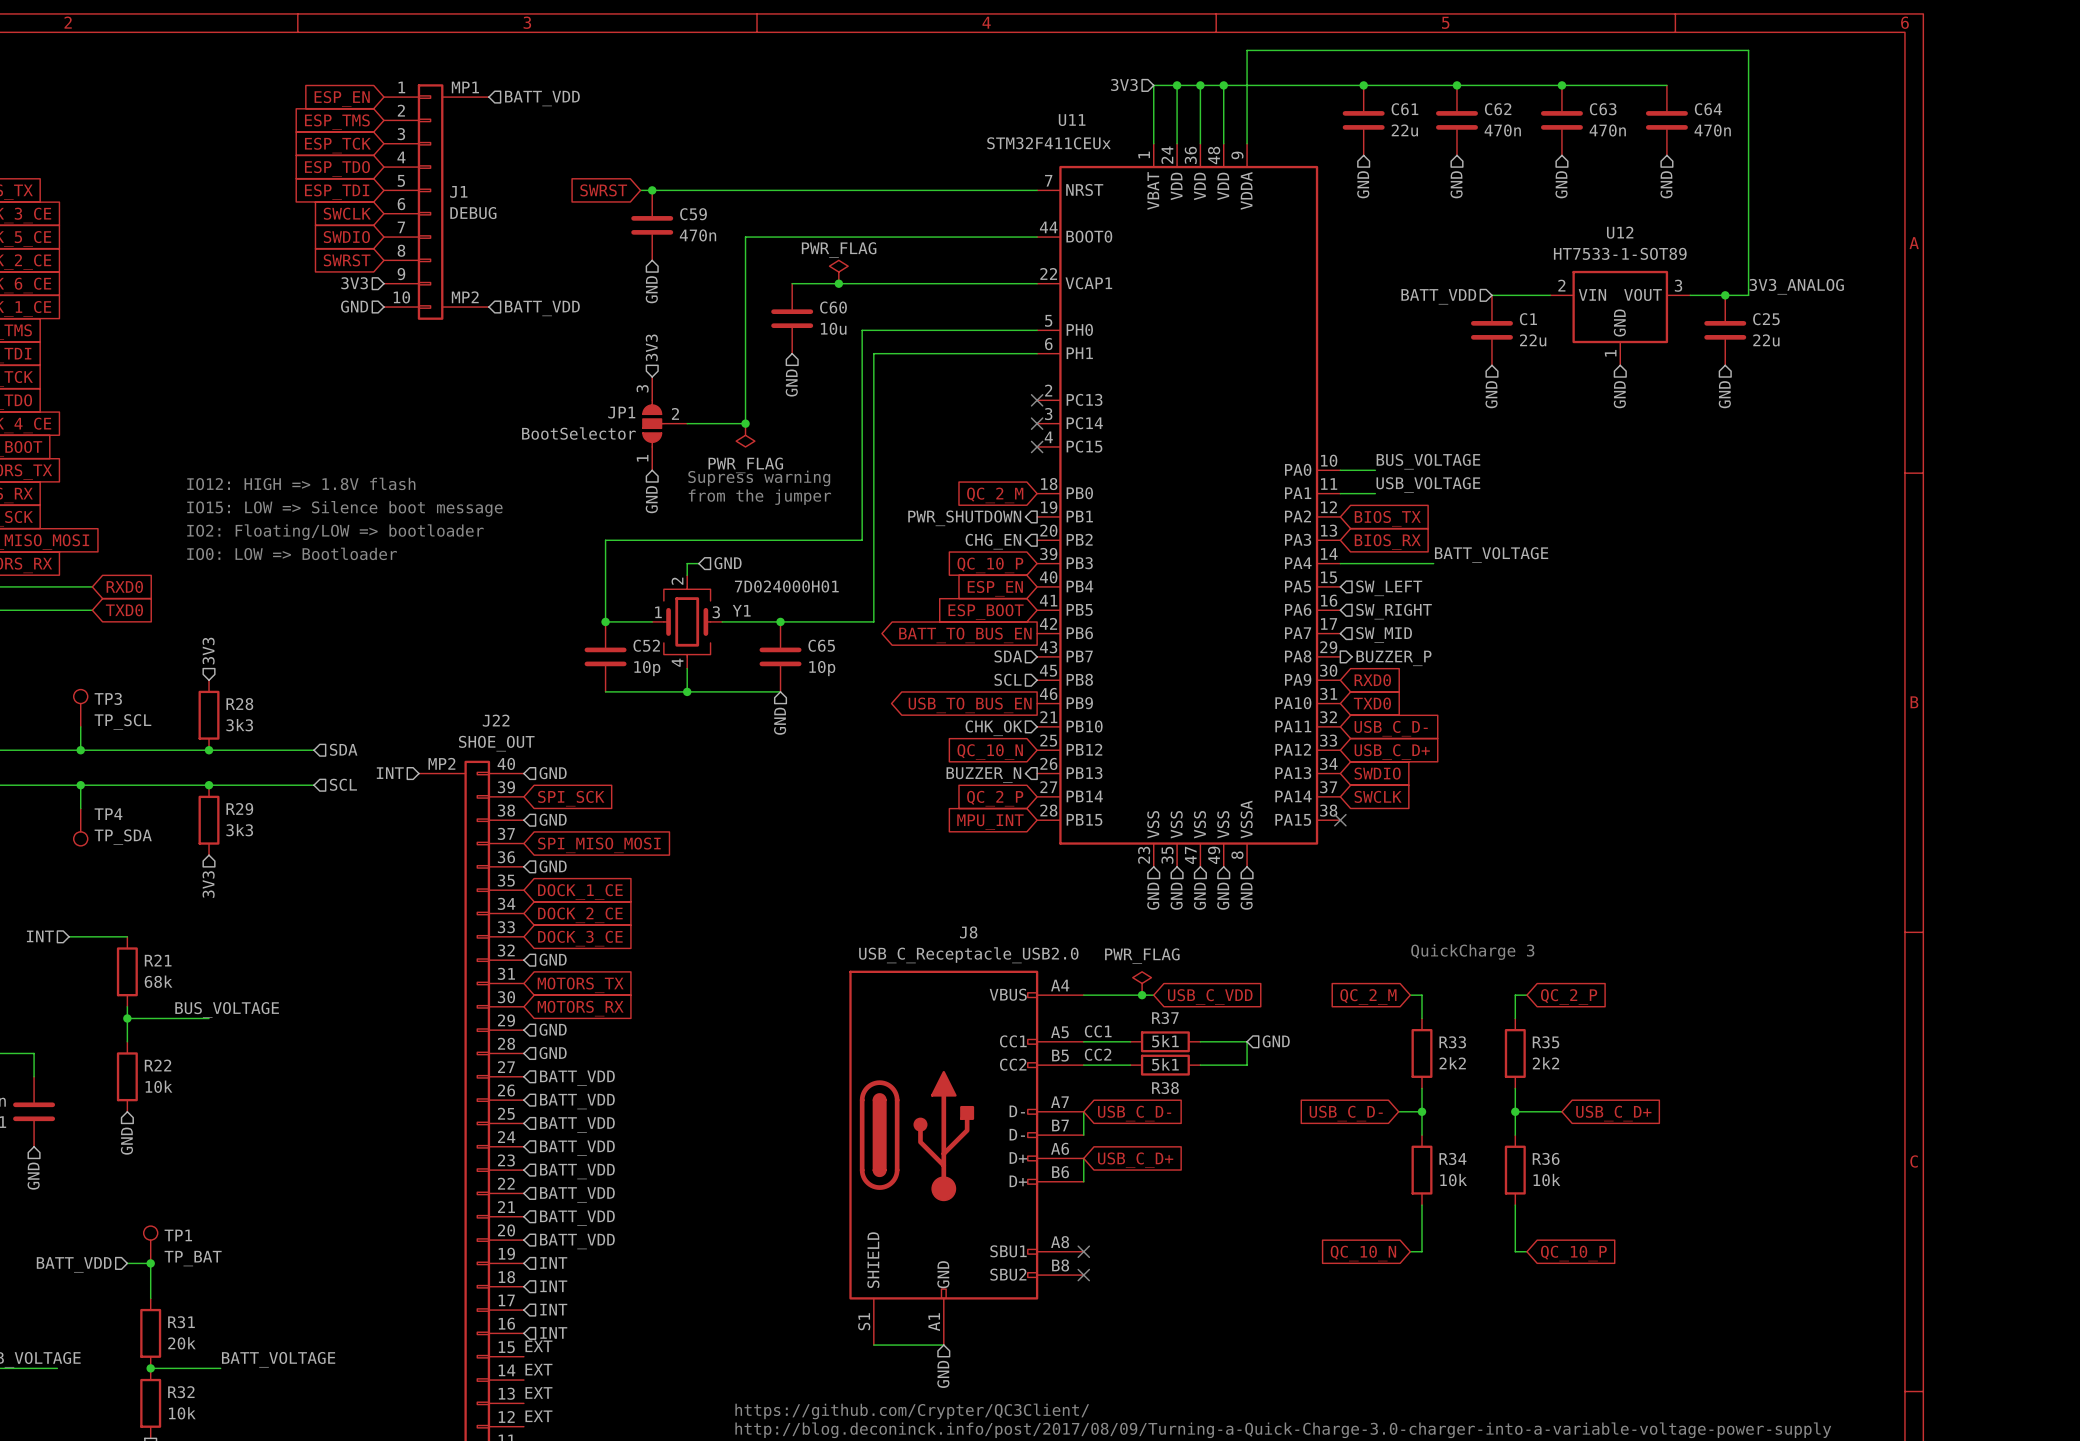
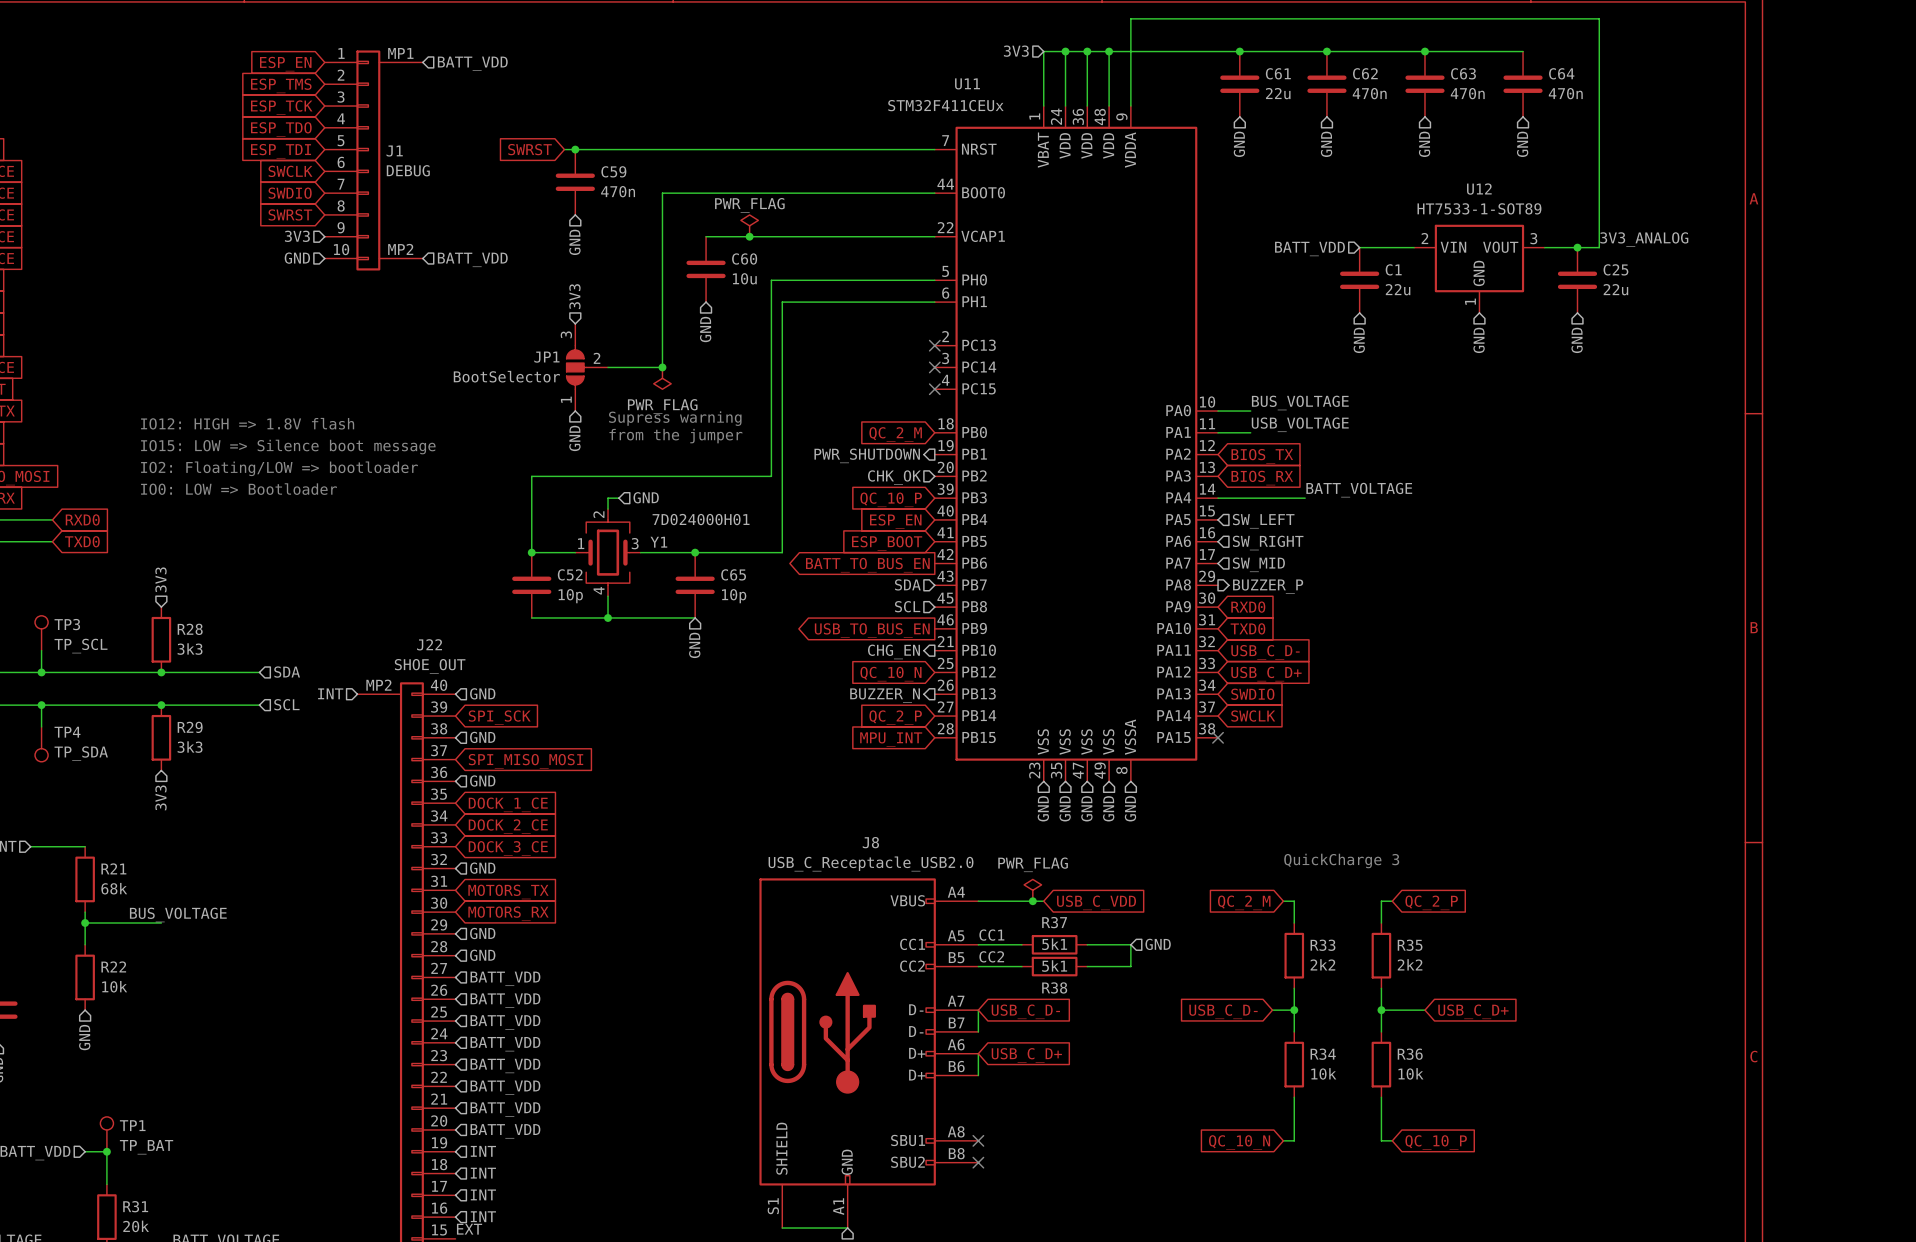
hierarchical label shape: output (993, 541) -> input (894, 477)
hierarchical label: CHG_EN (993, 541) -> CHK_OK (894, 477)
hierarchical label shape: input (993, 728) -> output (893, 651)
hierarchical label: CHK_OK (993, 728) -> CHG_EN (893, 651)

